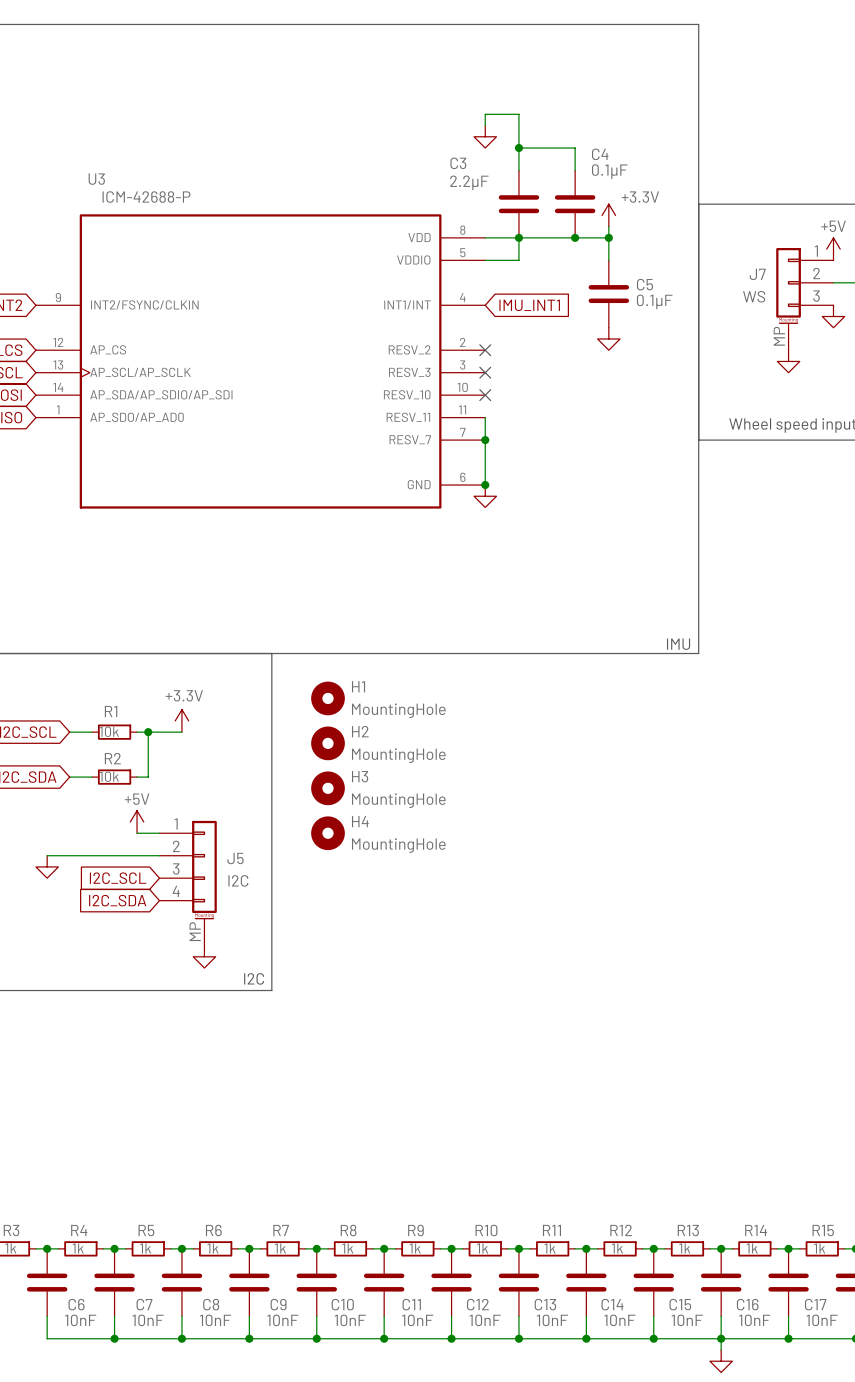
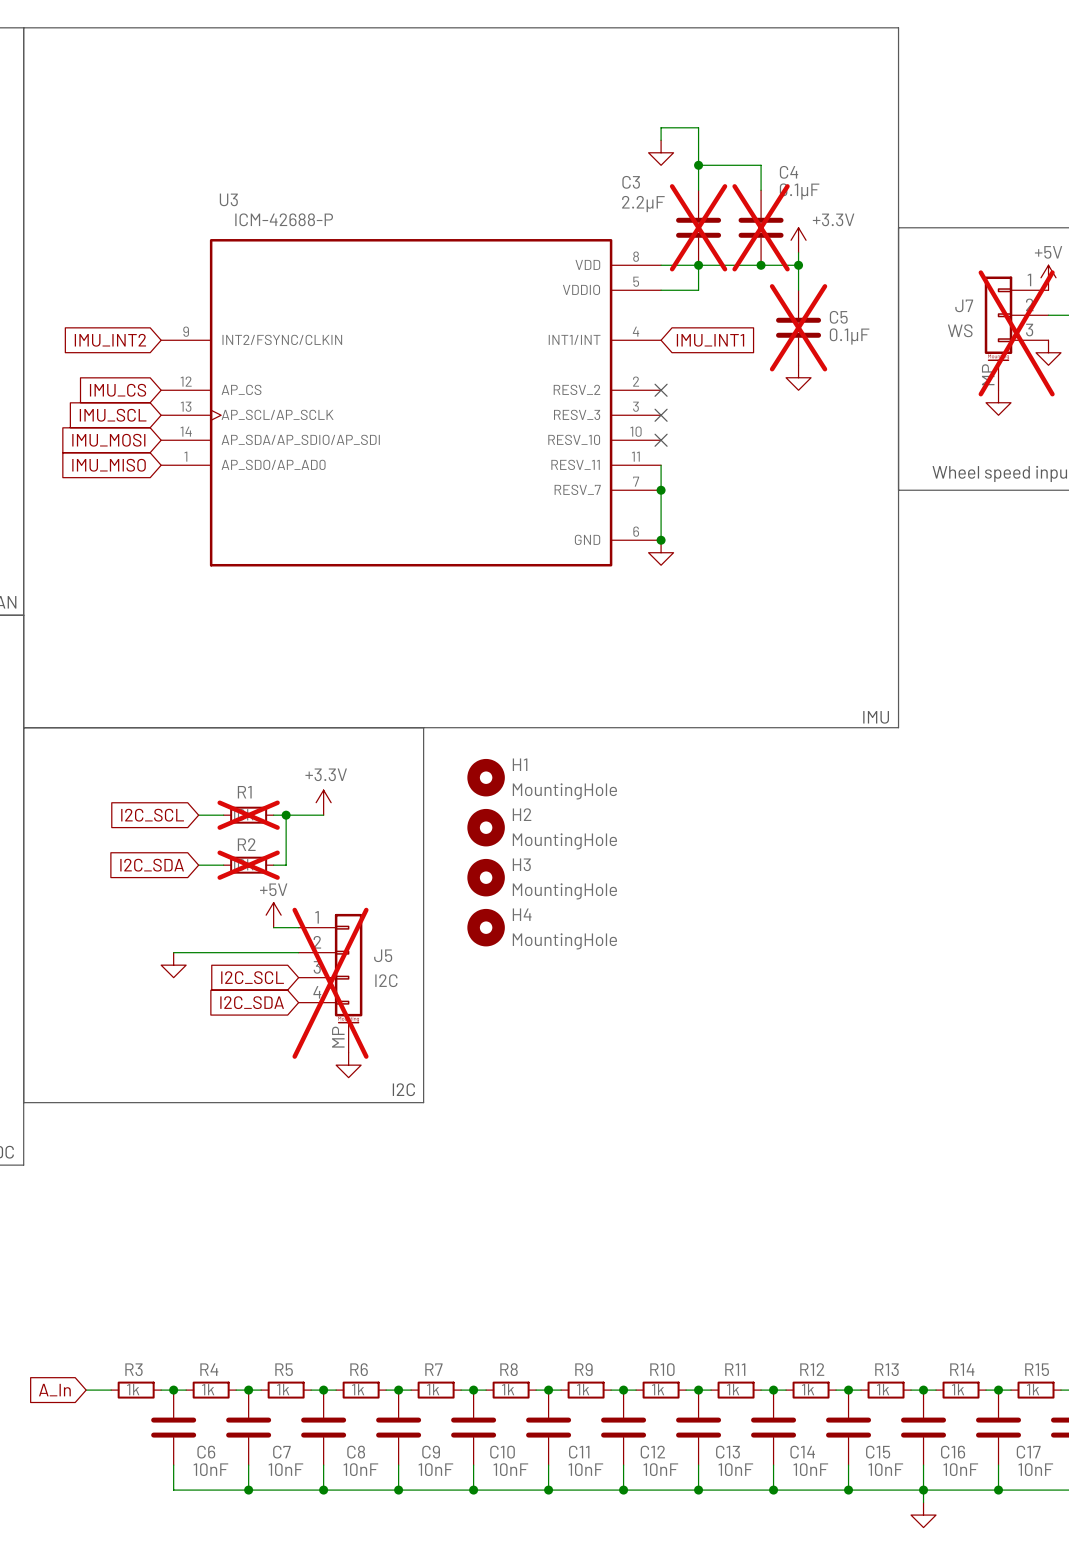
C3 do-not-place cross: none -> (698, 227)
C4 do-not-place cross: none -> (761, 227)
C5 do-not-place cross: none -> (798, 327)
J7 do-not-place cross: none -> (1016, 333)
R1 do-not-place cross: none -> (248, 815)
R2 do-not-place cross: none -> (248, 865)
J5 do-not-place cross: none -> (330, 983)

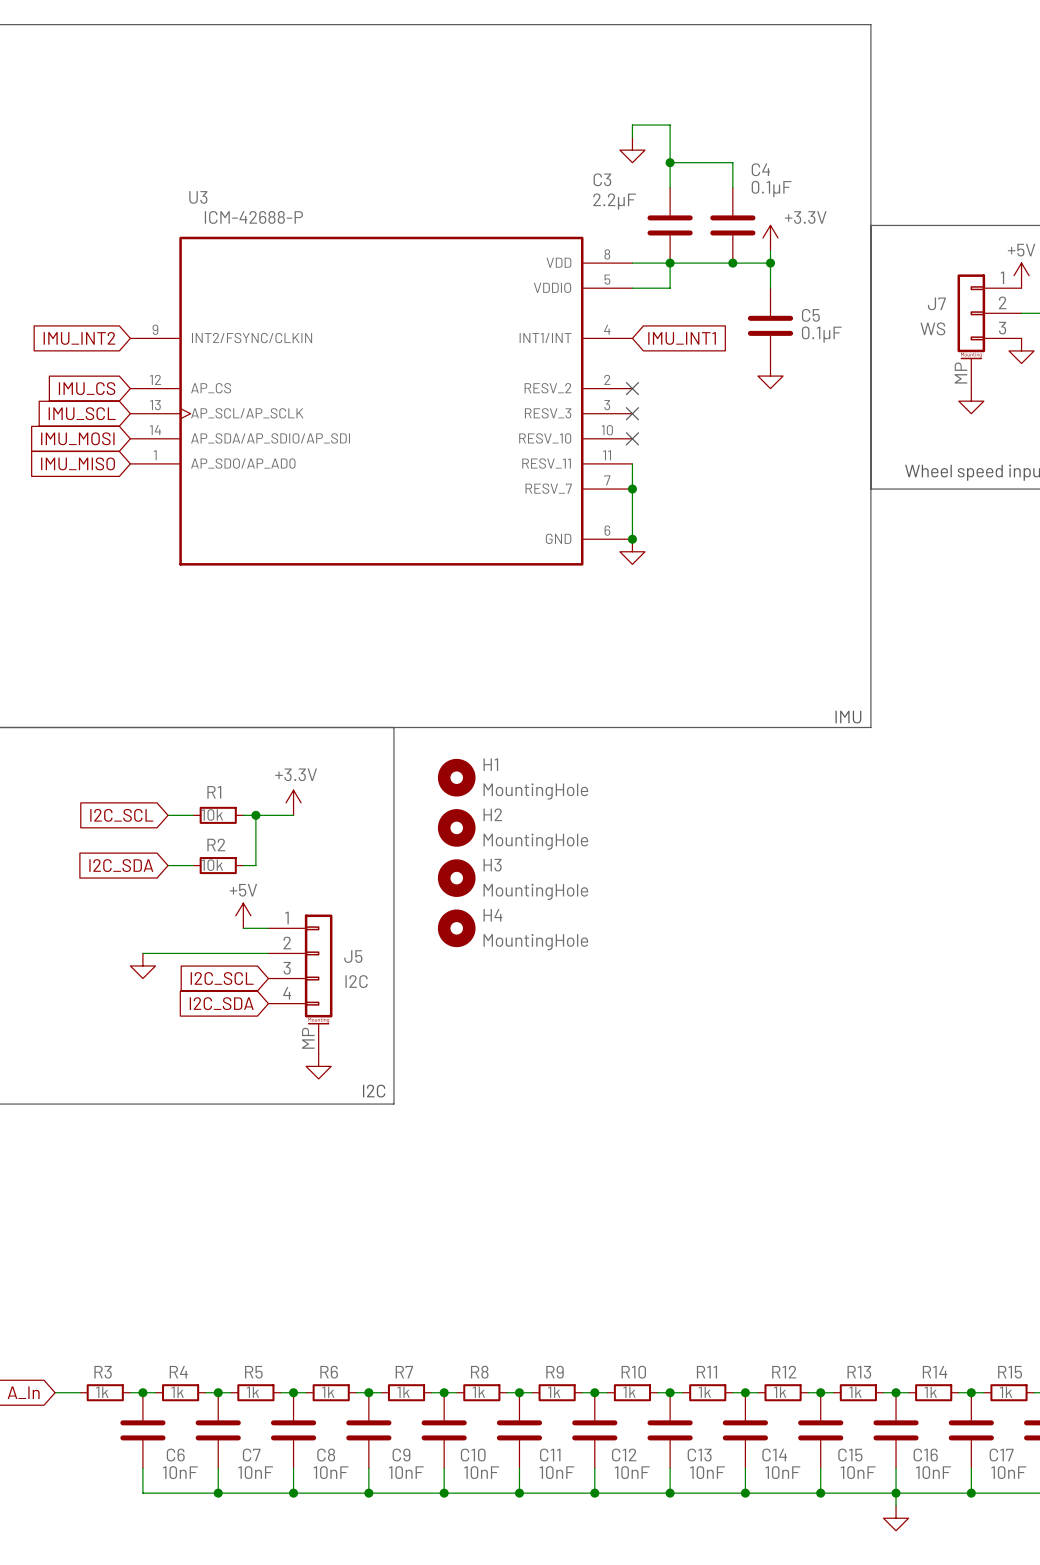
C3 do-not-place cross: (698, 227) -> none
C4 do-not-place cross: (761, 227) -> none
C5 do-not-place cross: (798, 327) -> none
J7 do-not-place cross: (1016, 333) -> none
R1 do-not-place cross: (248, 815) -> none
R2 do-not-place cross: (248, 865) -> none
J5 do-not-place cross: (330, 983) -> none

